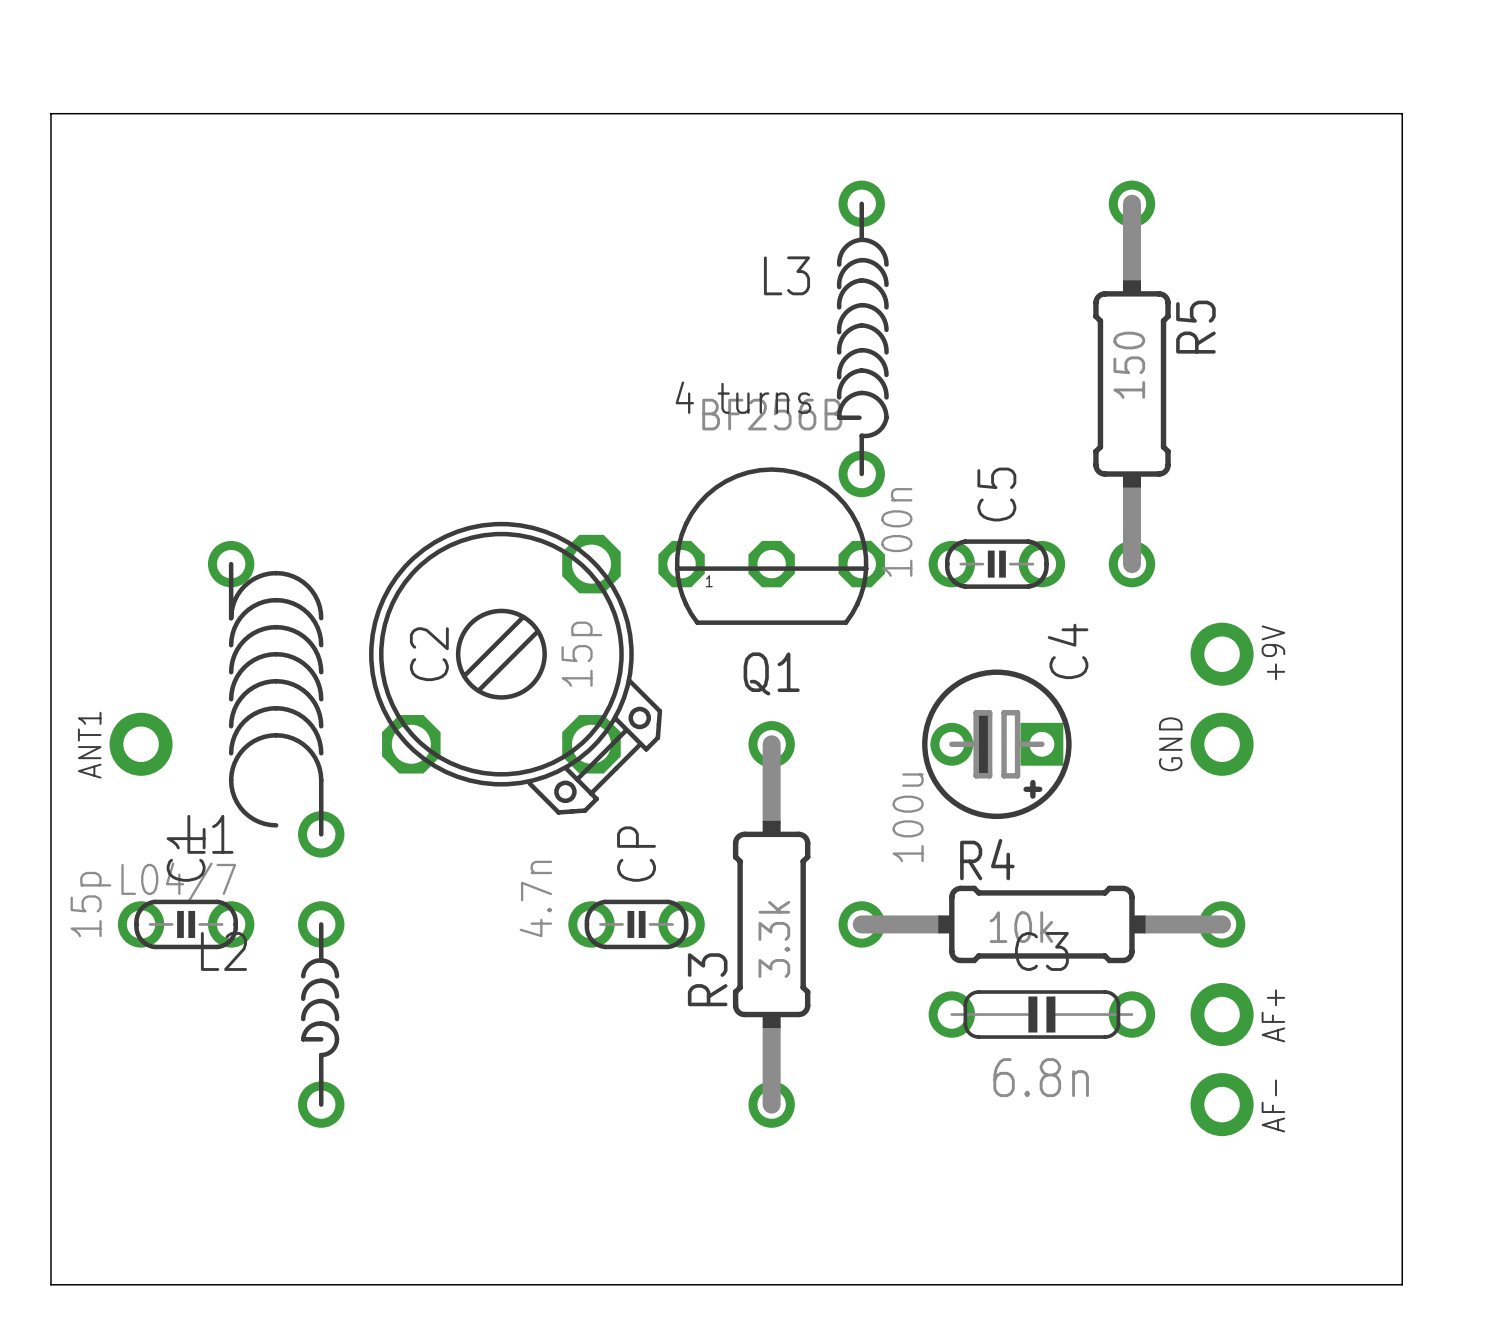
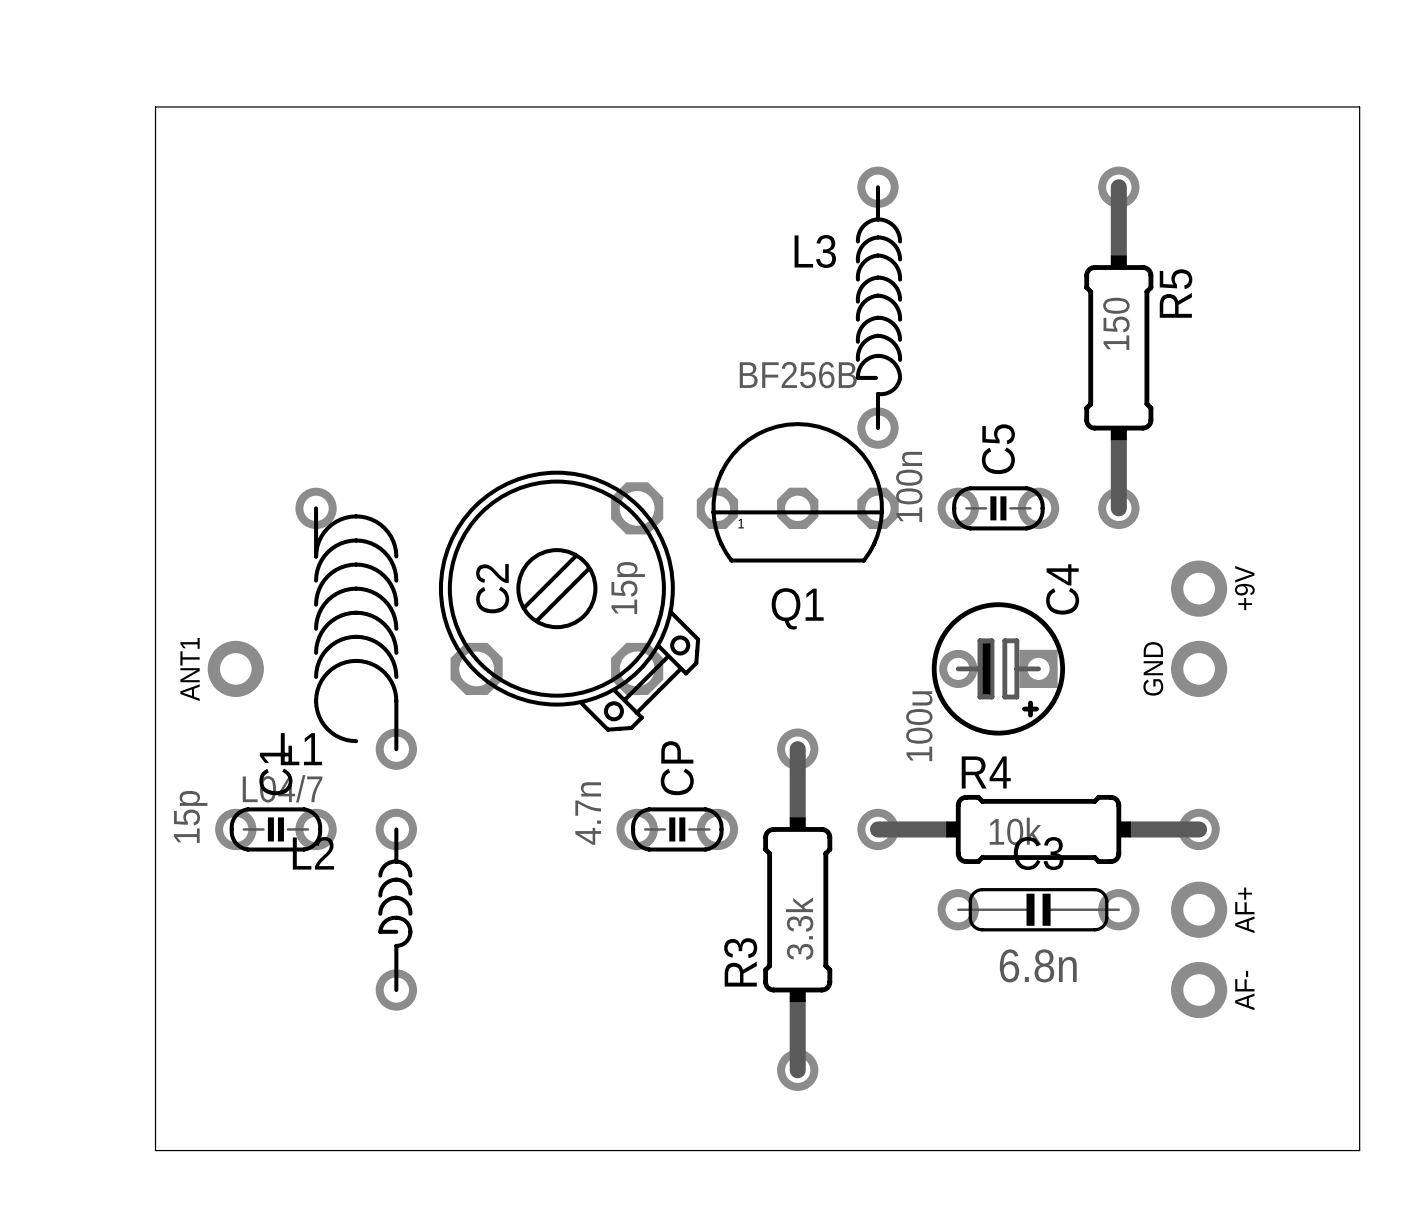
L3 value: 4 turns (743, 397) -> none
R3 position: (771, 924) -> (797, 909)

